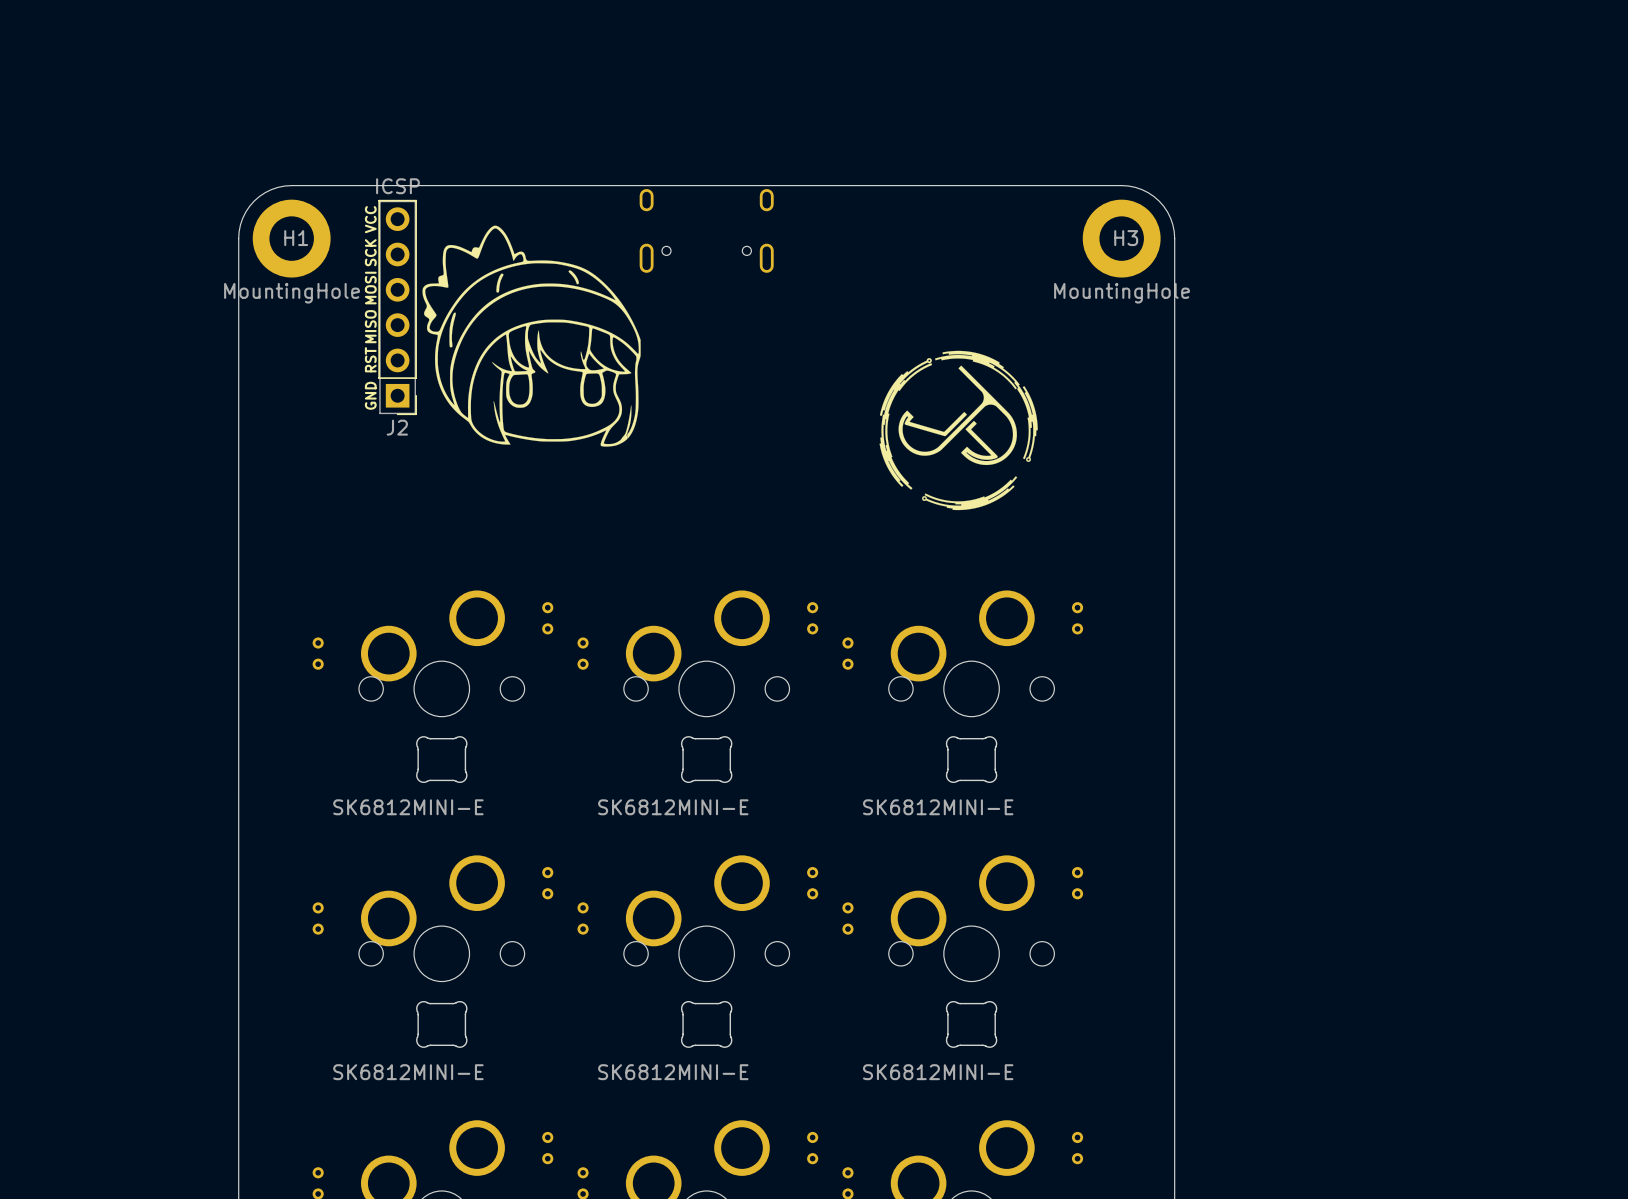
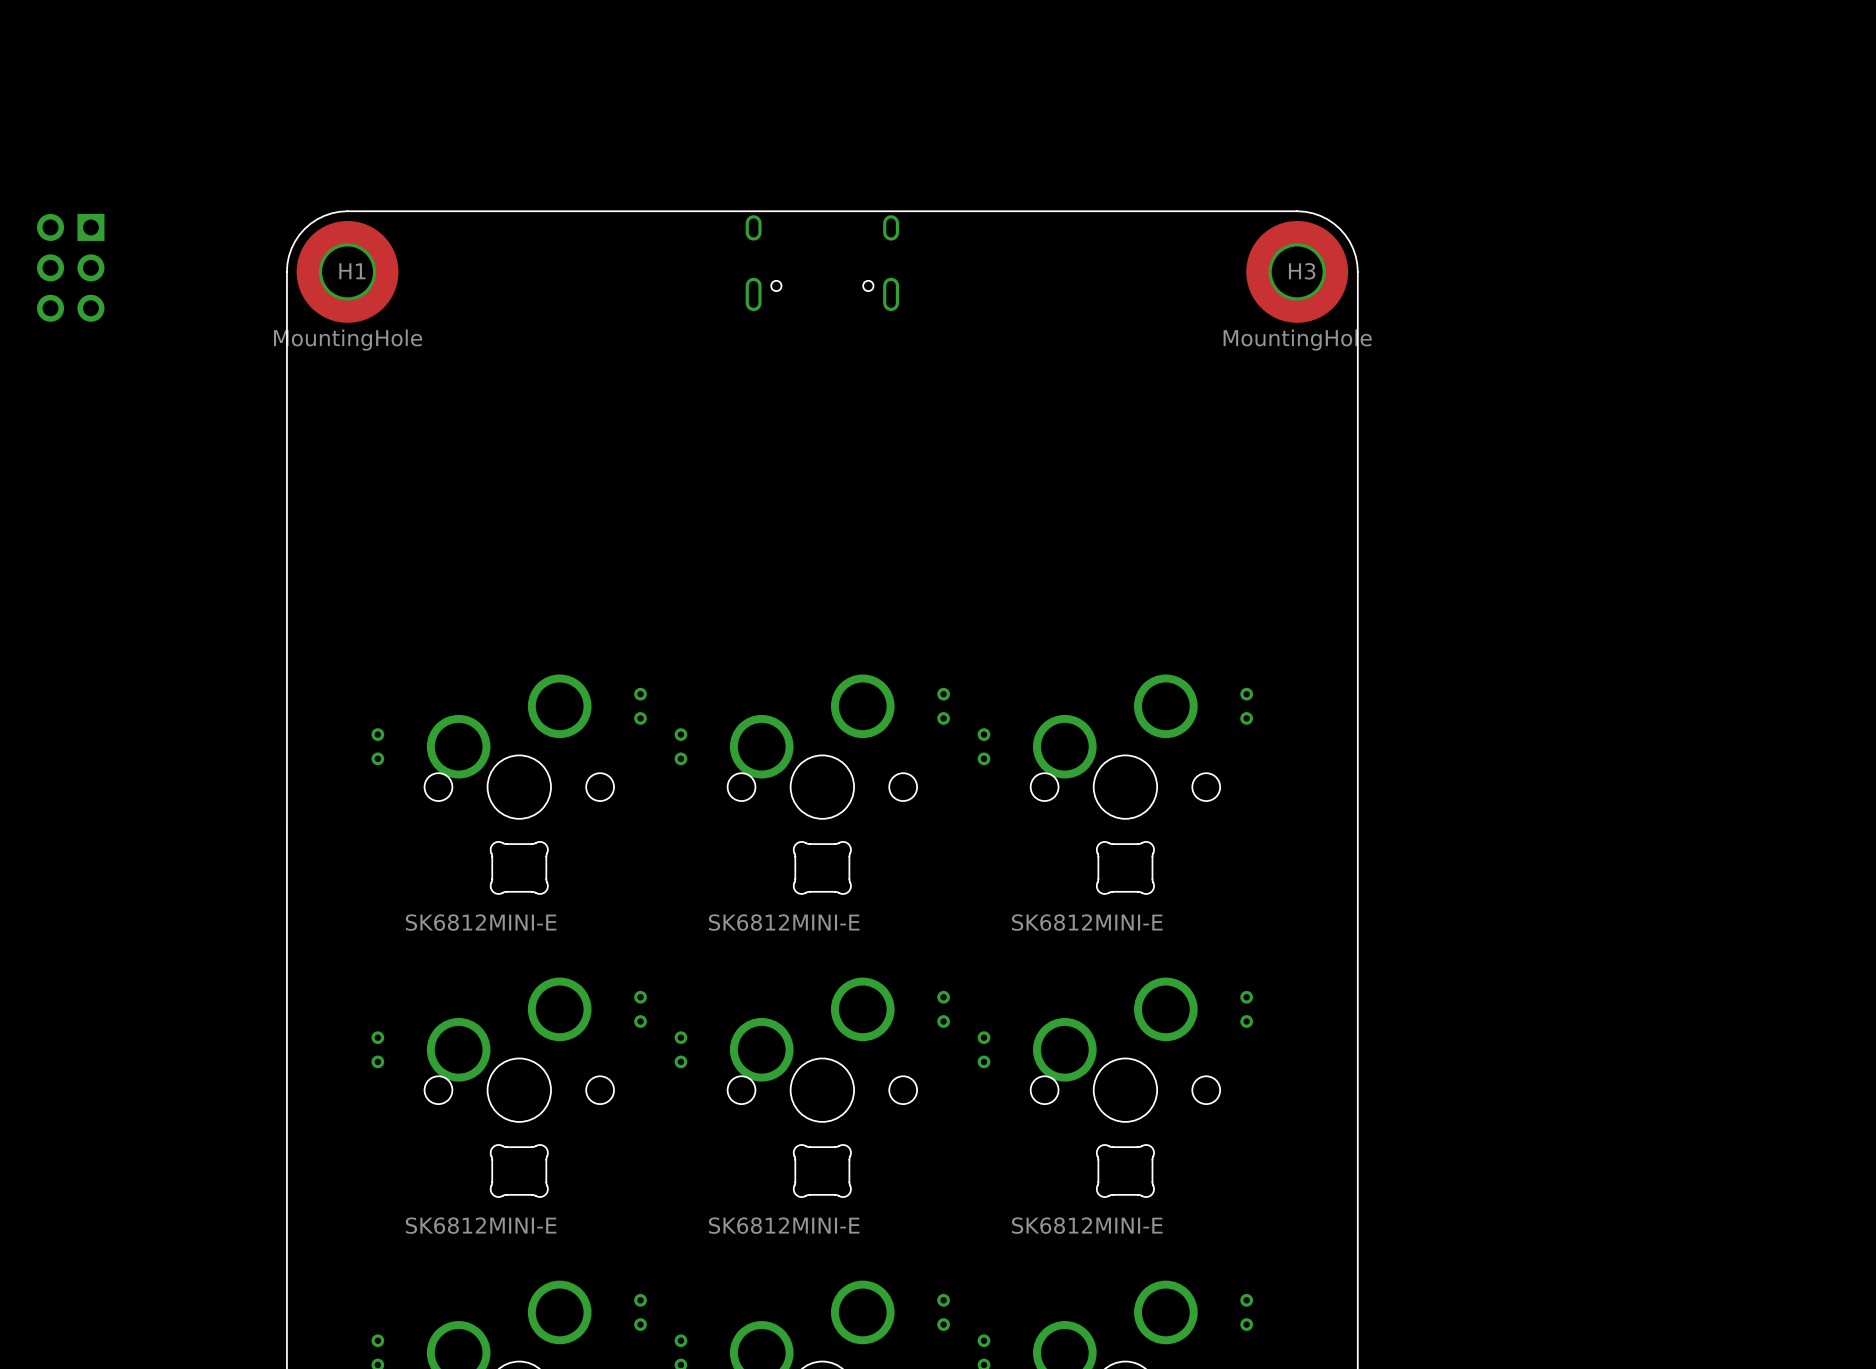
H1 footprint: [252, 199, 331, 278] -> [296, 220, 399, 323]
H3 footprint: [1082, 199, 1161, 278] -> [1246, 220, 1349, 323]
drawing: [422, 225, 641, 447] -> none
part: none -> (70, 267)
J2: ICSP (397, 307) -> none
drawing: [879, 350, 1038, 511] -> none

